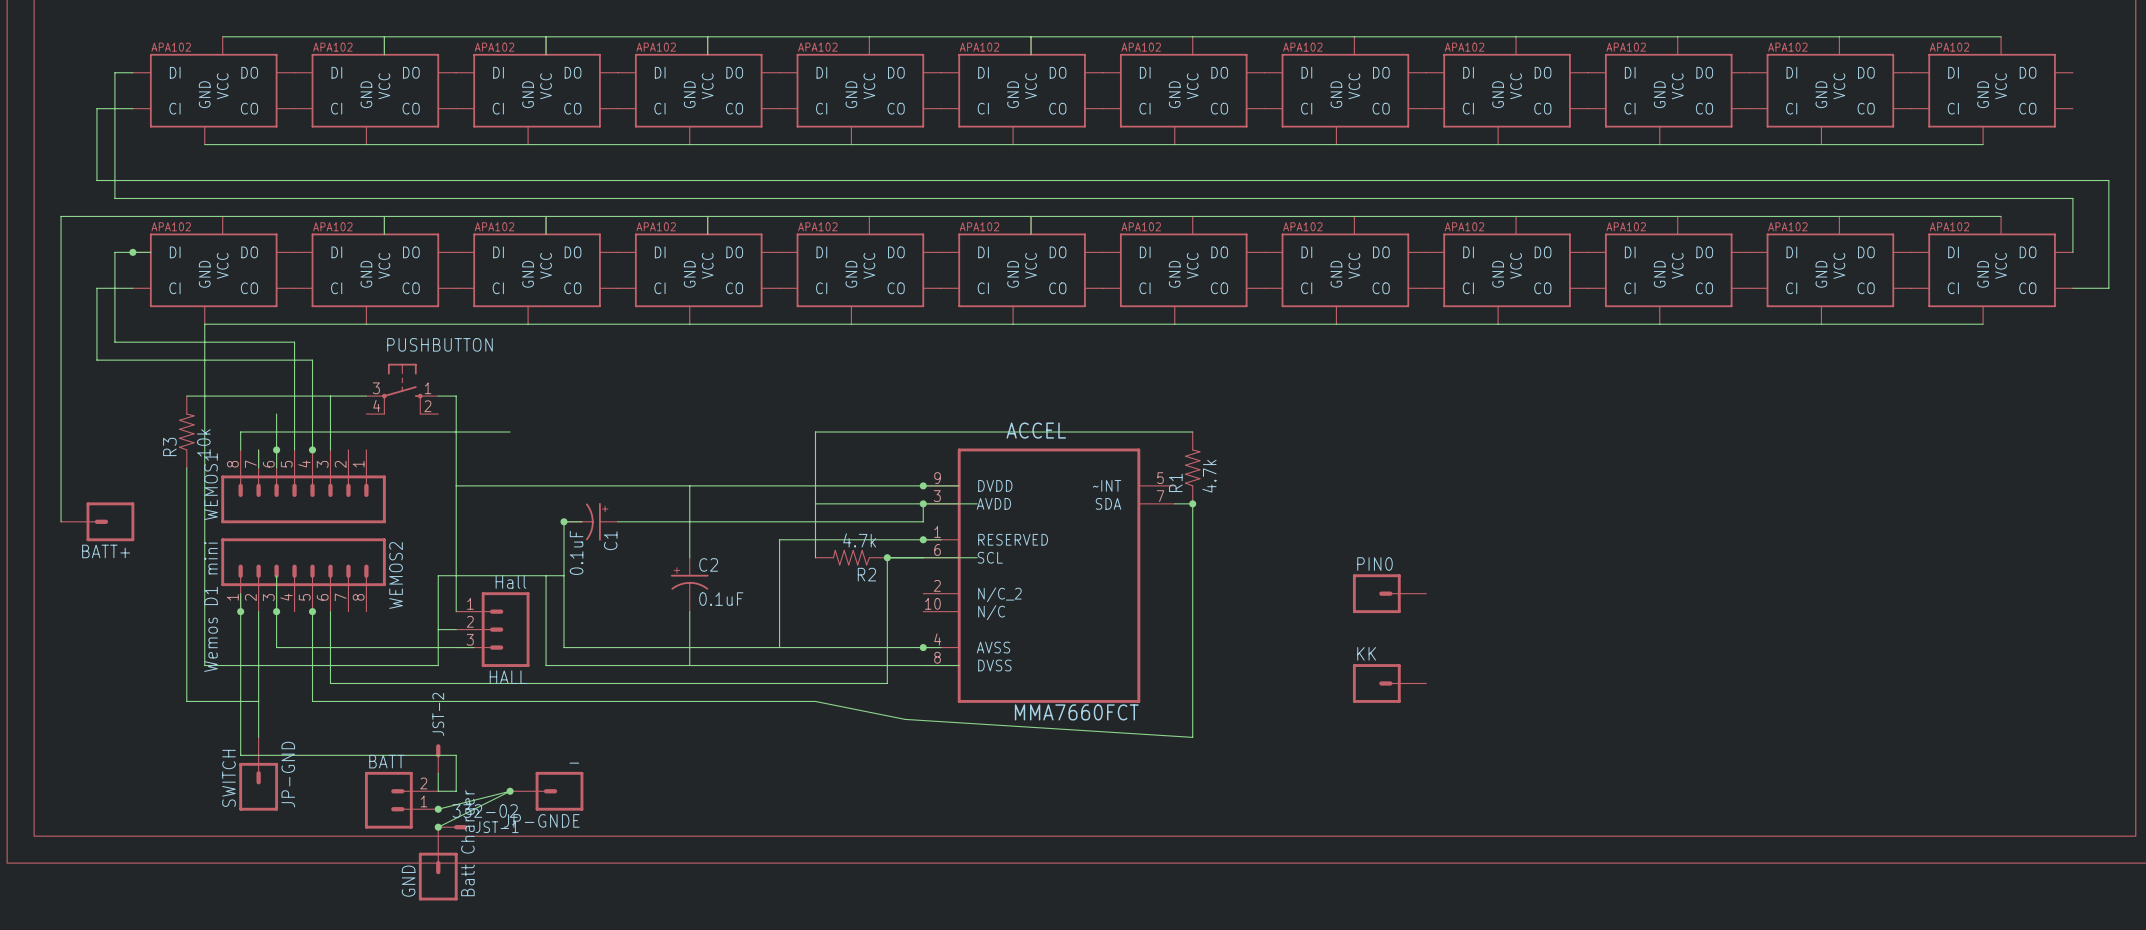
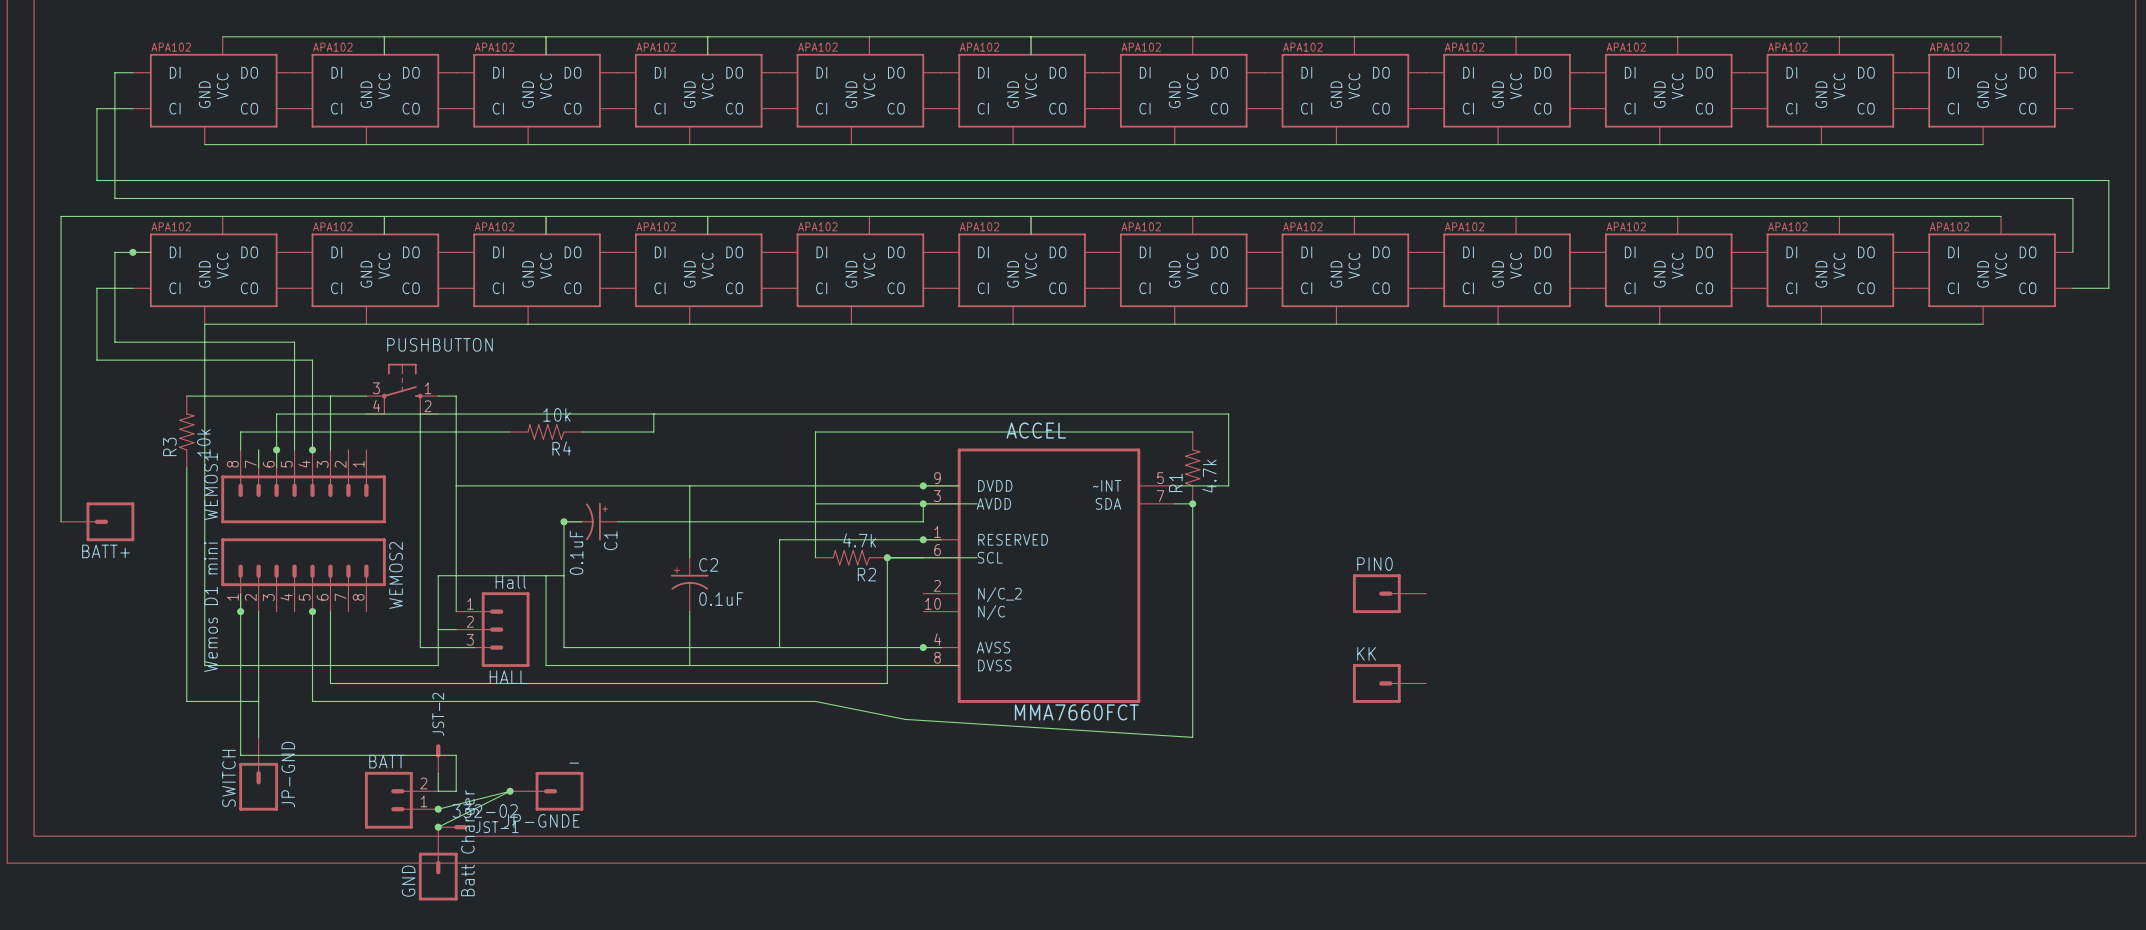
wire: none -> (276, 414) (1228, 414) (1228, 485) (1174, 485)
wire: none -> (653, 414) (653, 432) (581, 432)
R4: none -> 10k (546, 432)
wire: (276, 575) (276, 647) (420, 647) -> (420, 414) (420, 647)
junction: (276, 611) -> none

